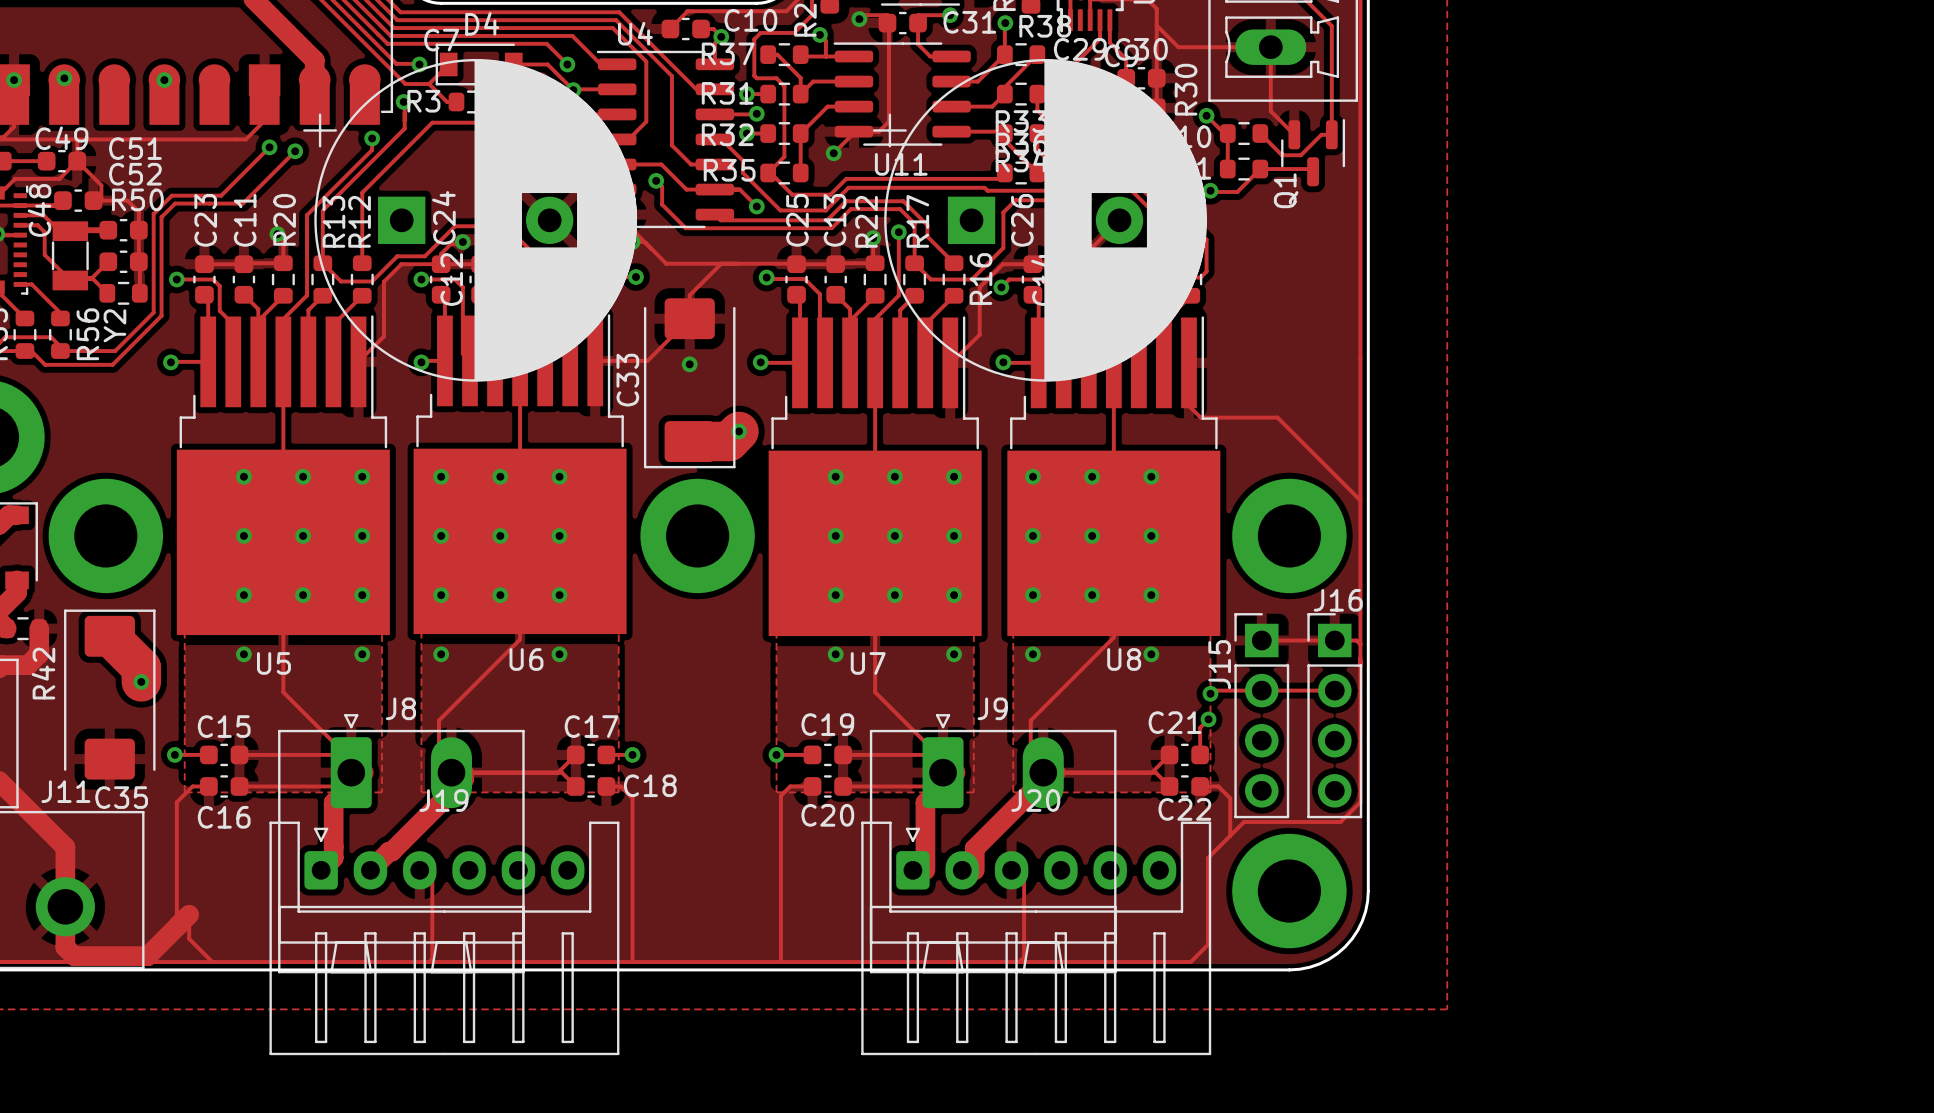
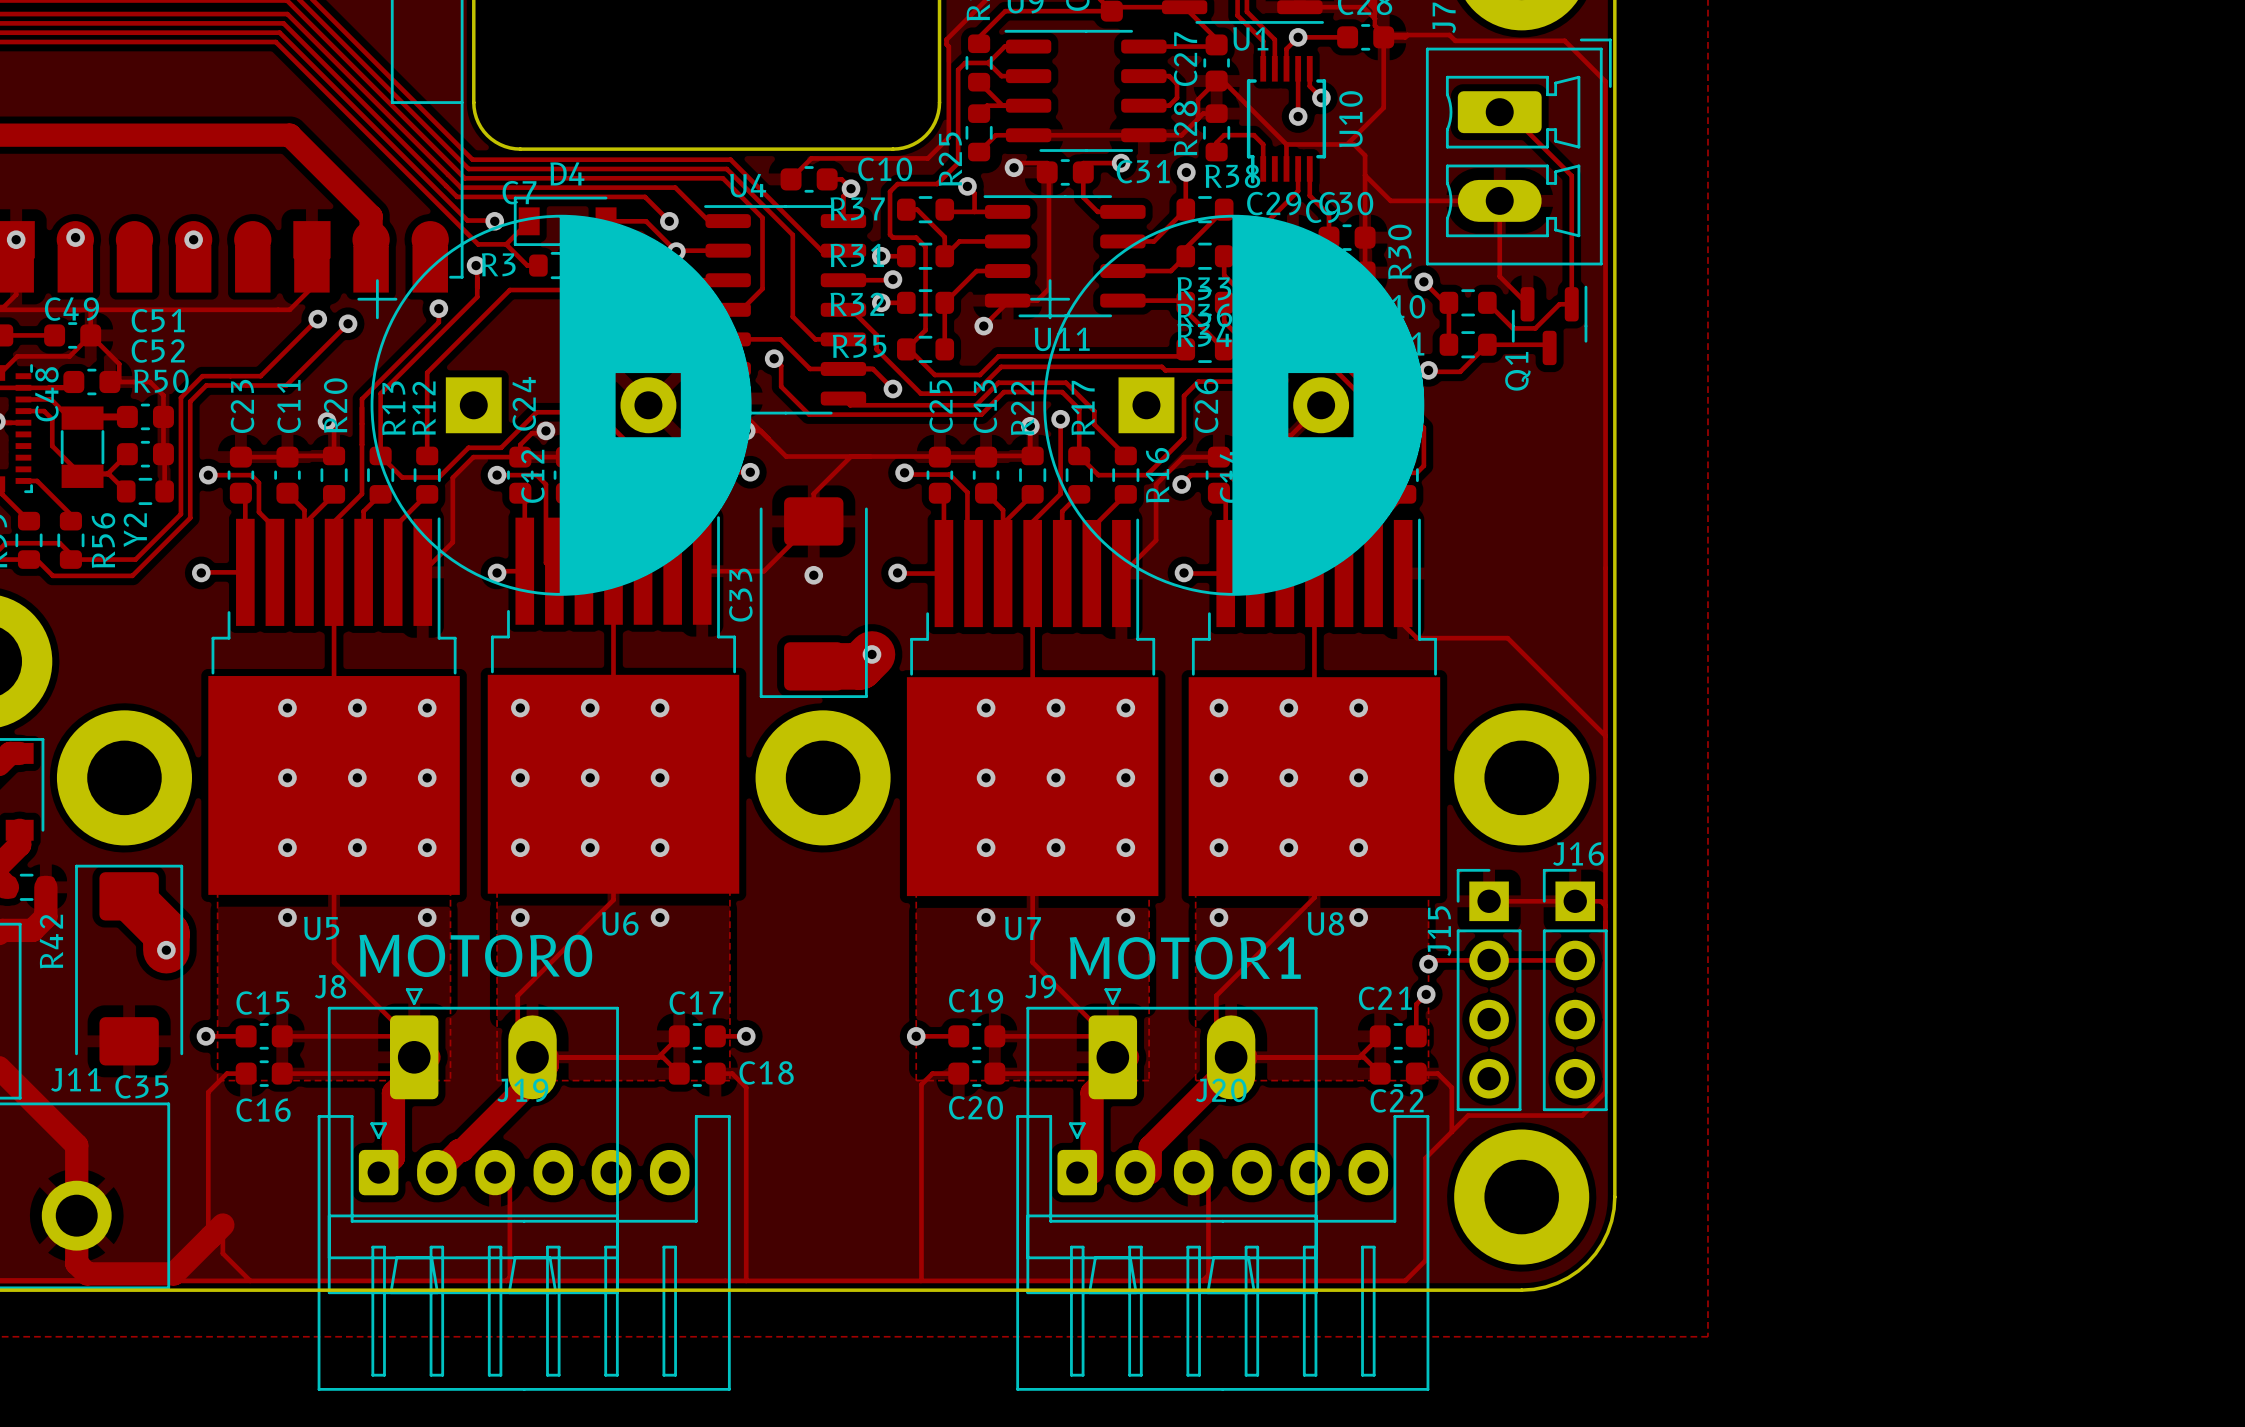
text: none -> MOTOR0 (475, 955)
text: none -> MOTOR1 (1185, 958)
J8 name position: J8 (400, 708) -> J8 (330, 986)
J9 name position: J9 (992, 708) -> J9 (1040, 986)

